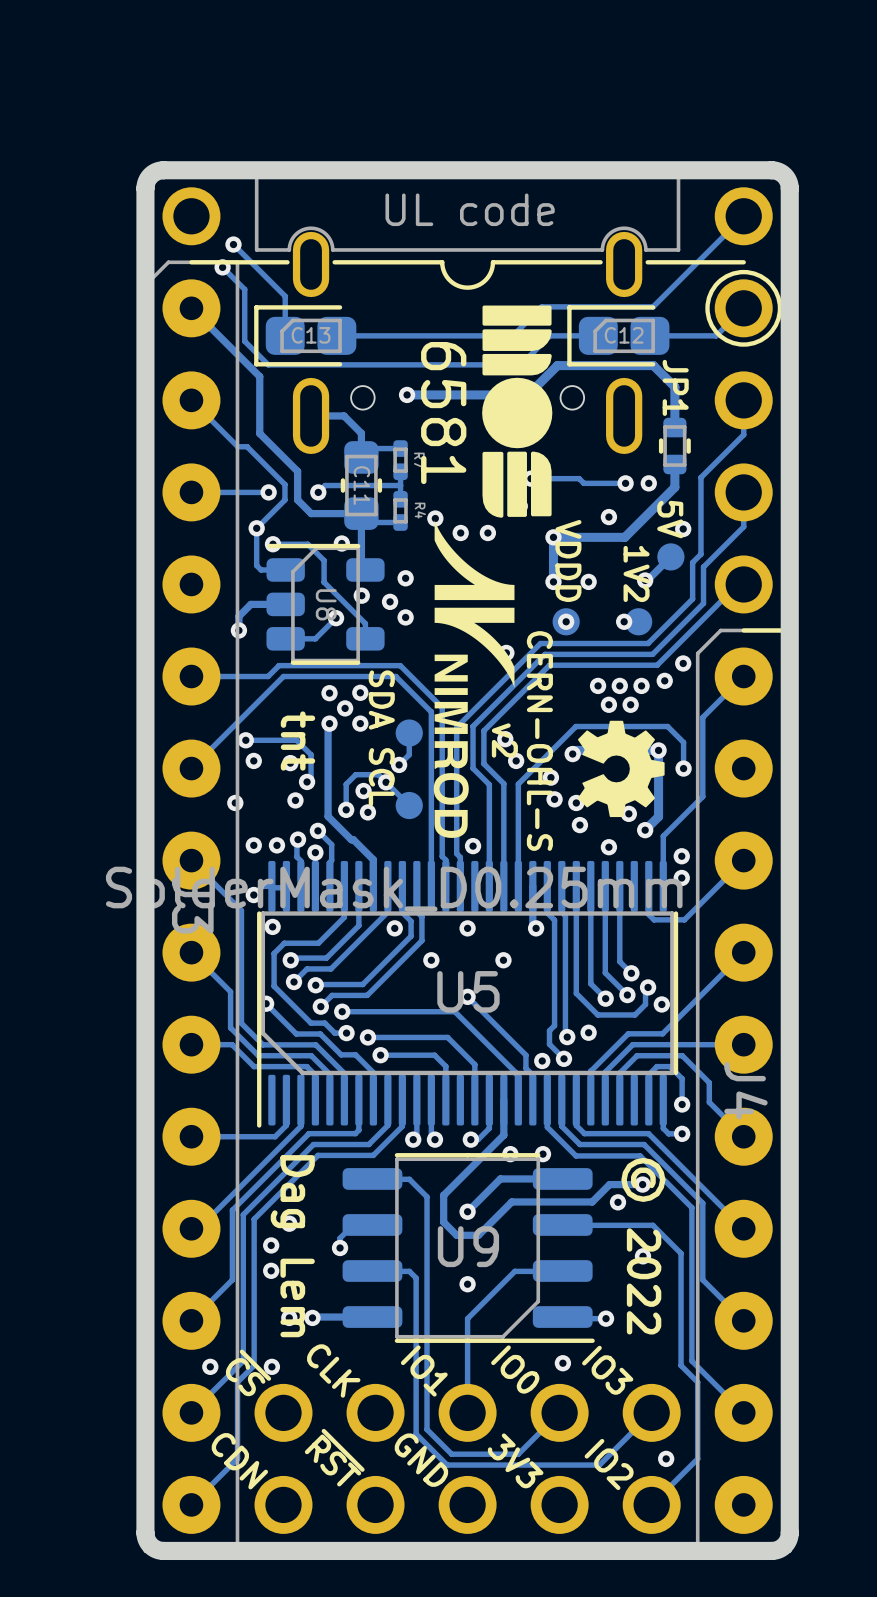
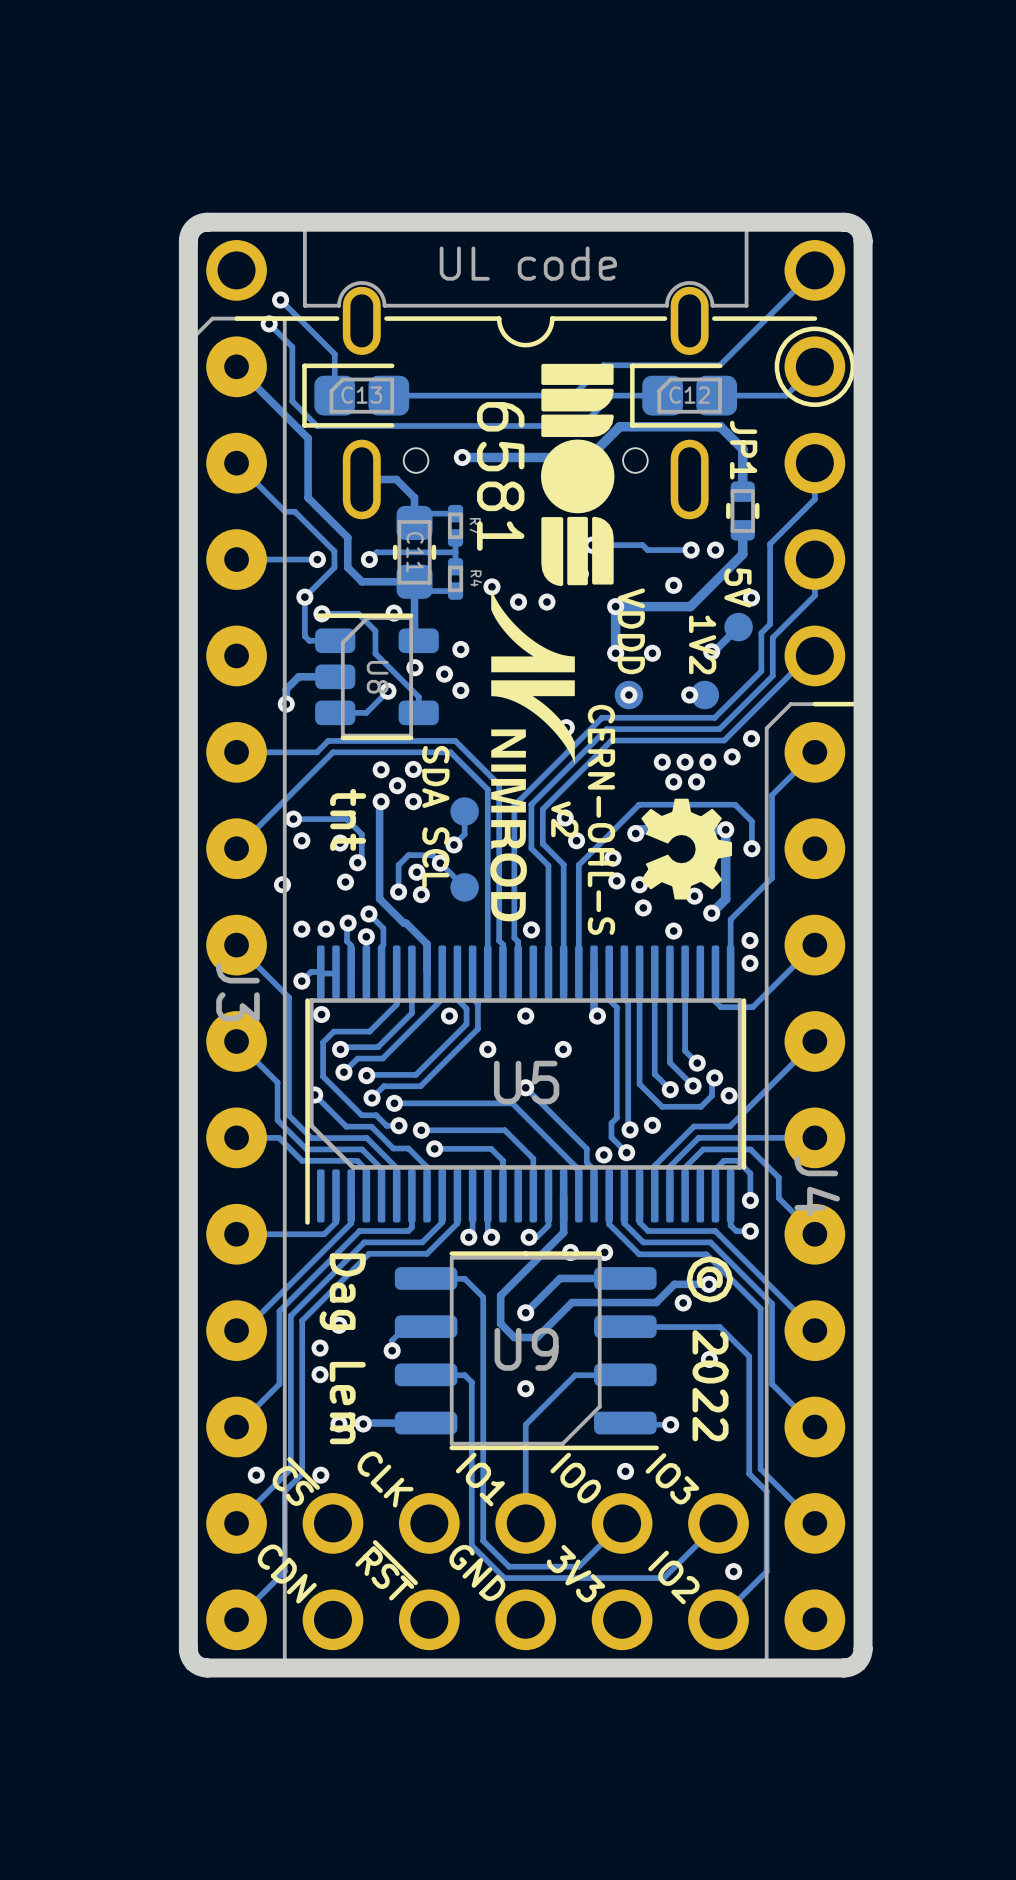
drawing: [105, 866, 683, 912] -> none

